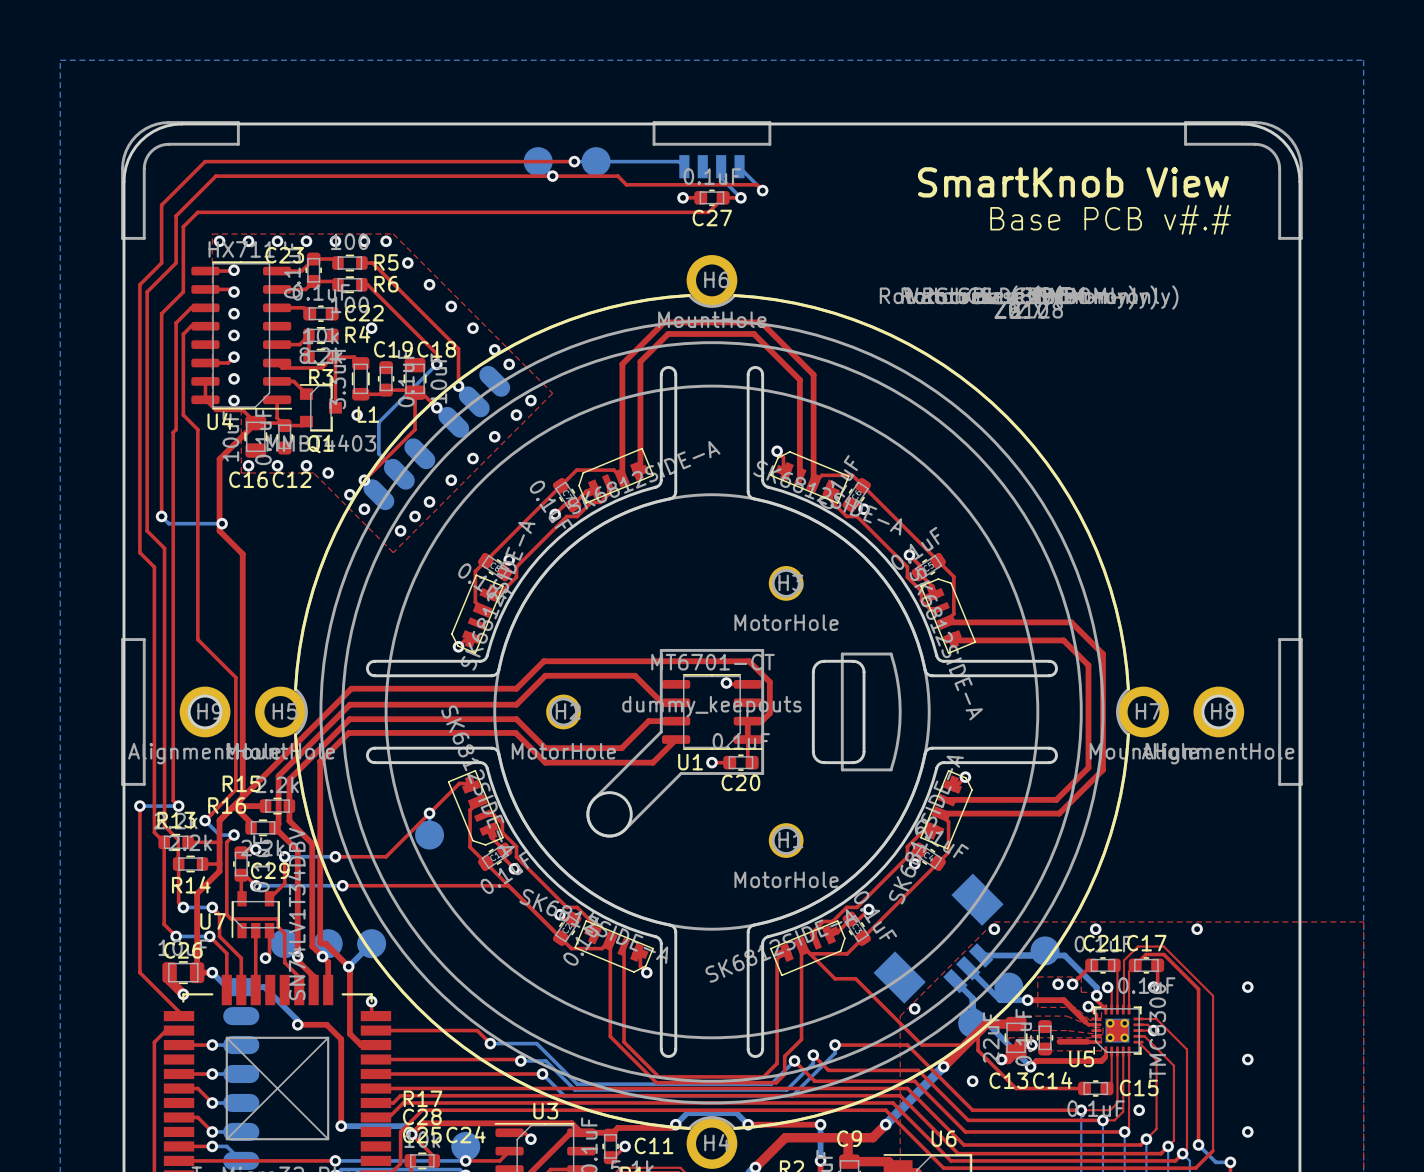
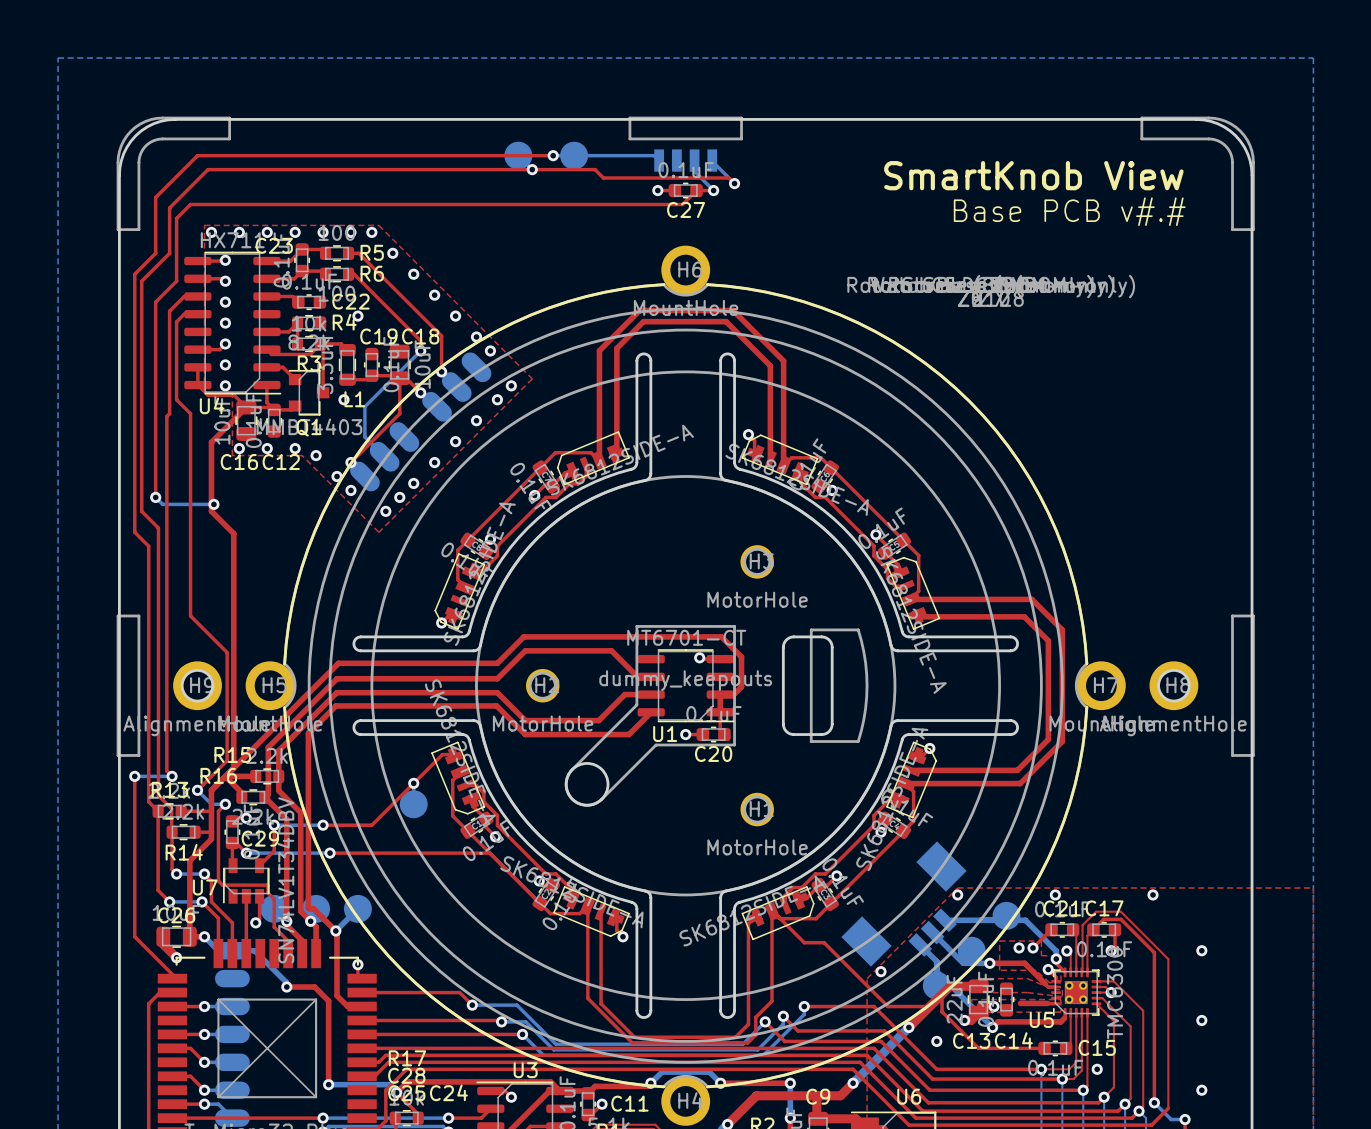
part: (465, 1146) -> none

